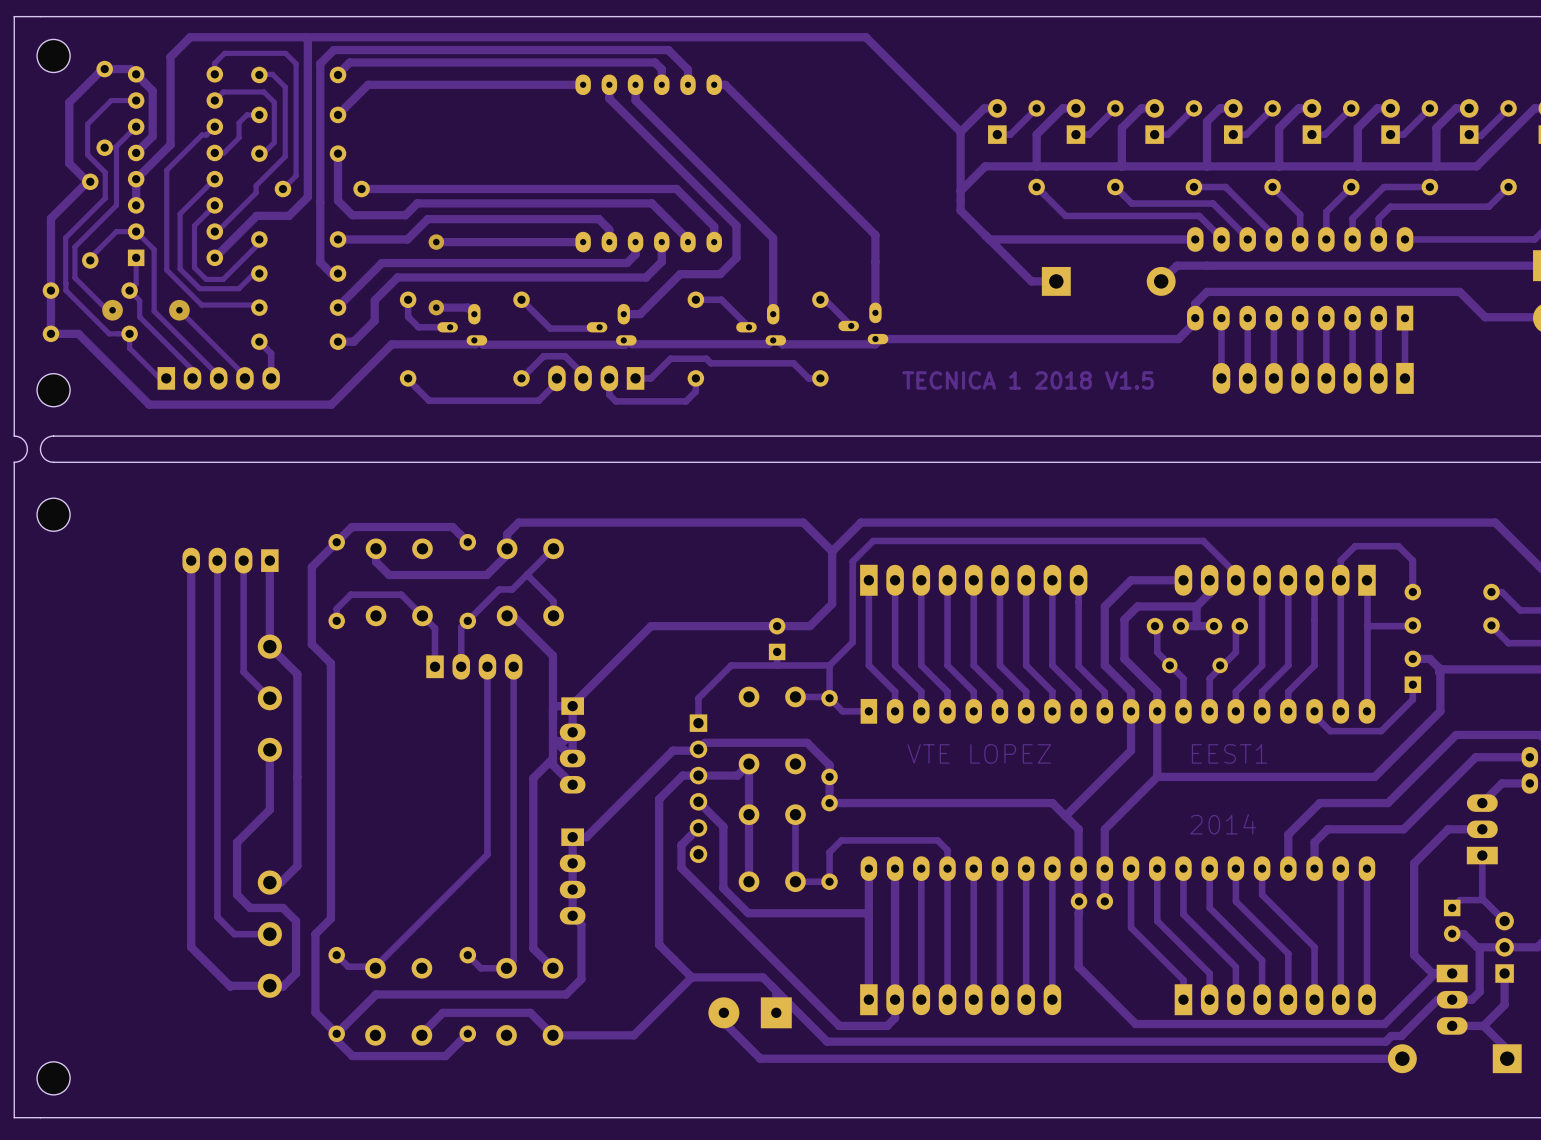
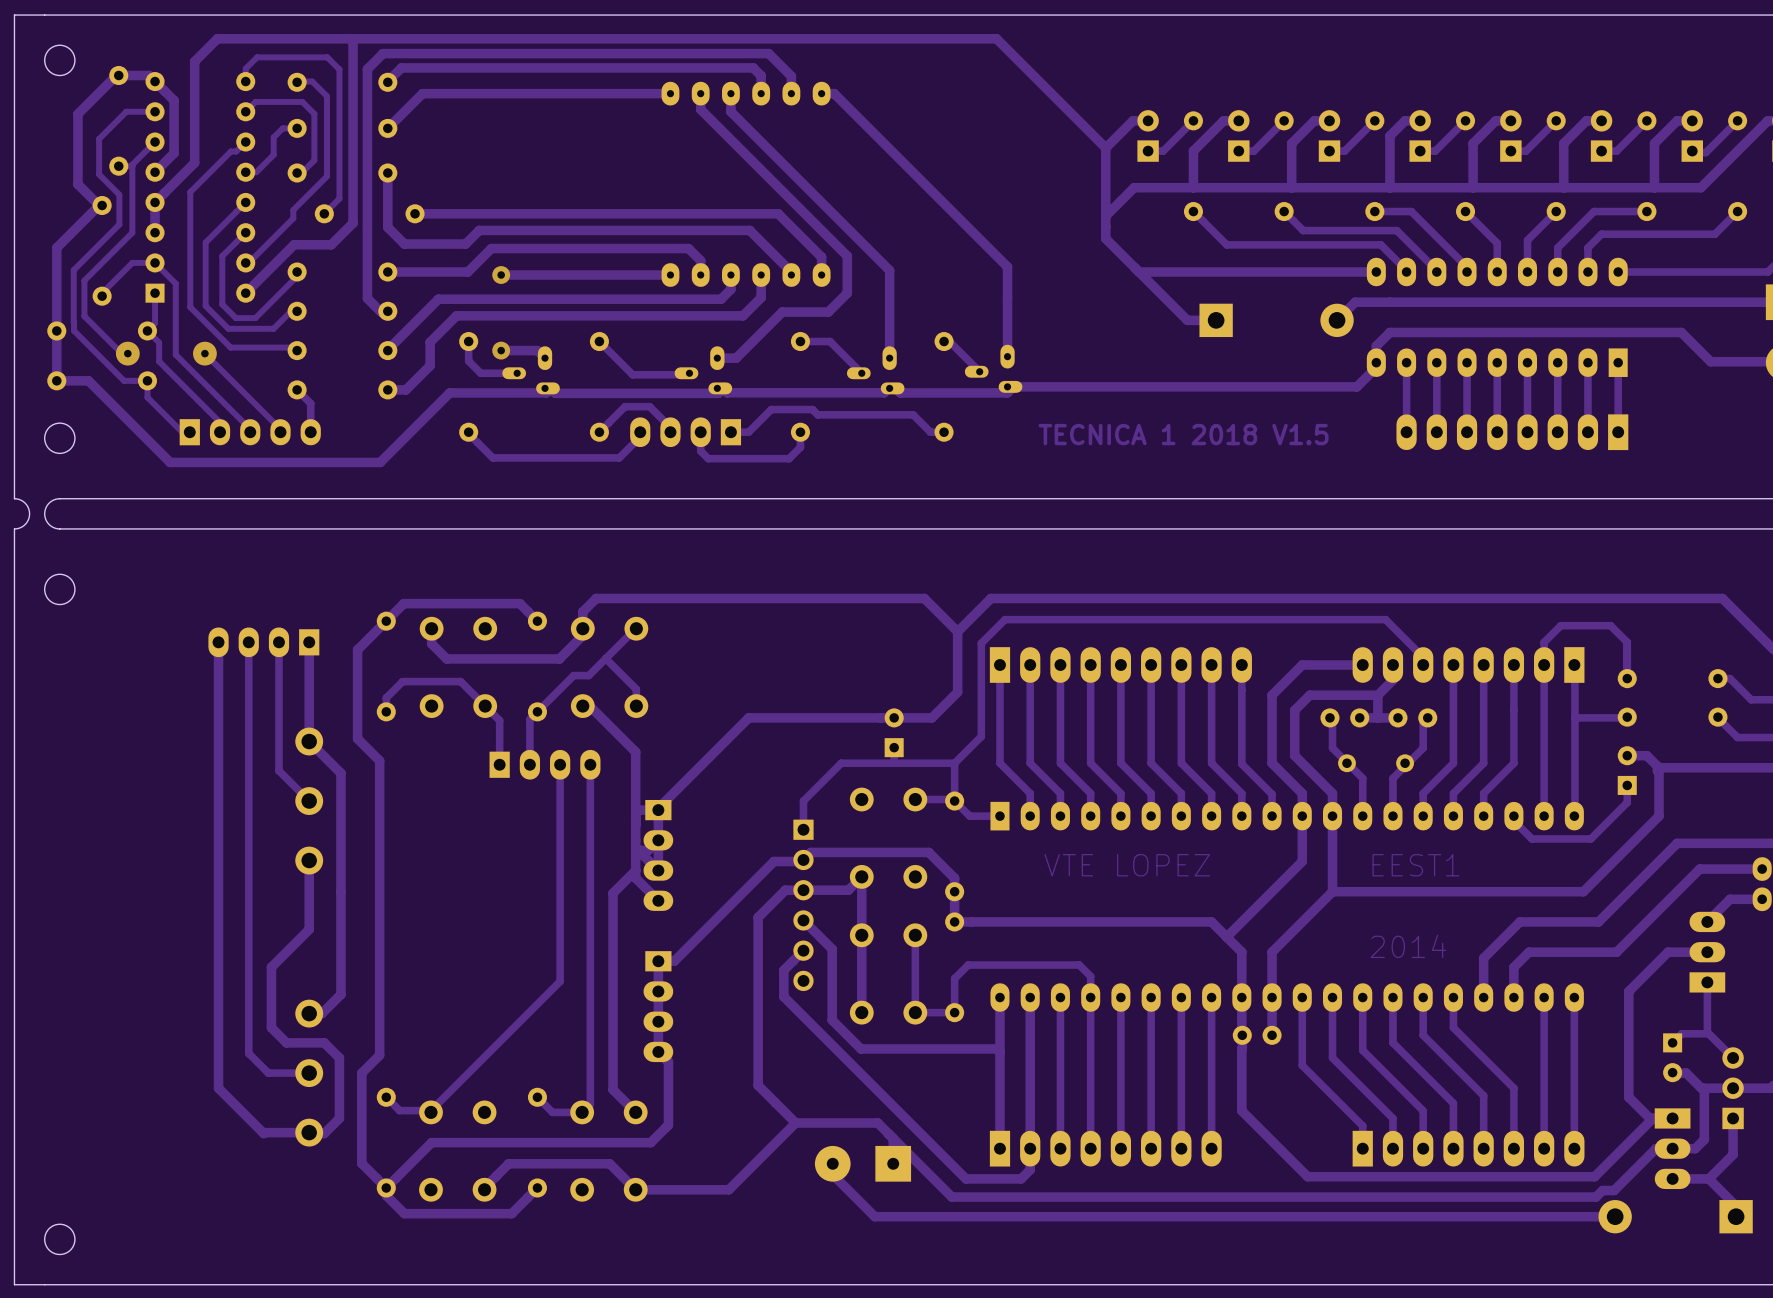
round board edge: none -> [44, 44, 76, 77]
part: (53, 55) -> none
round board edge: none -> [44, 422, 76, 454]
part: (53, 390) -> none
round board edge: none -> [44, 573, 76, 606]
part: (53, 514) -> none
round board edge: none -> [44, 1223, 76, 1256]
part: (53, 1078) -> none

